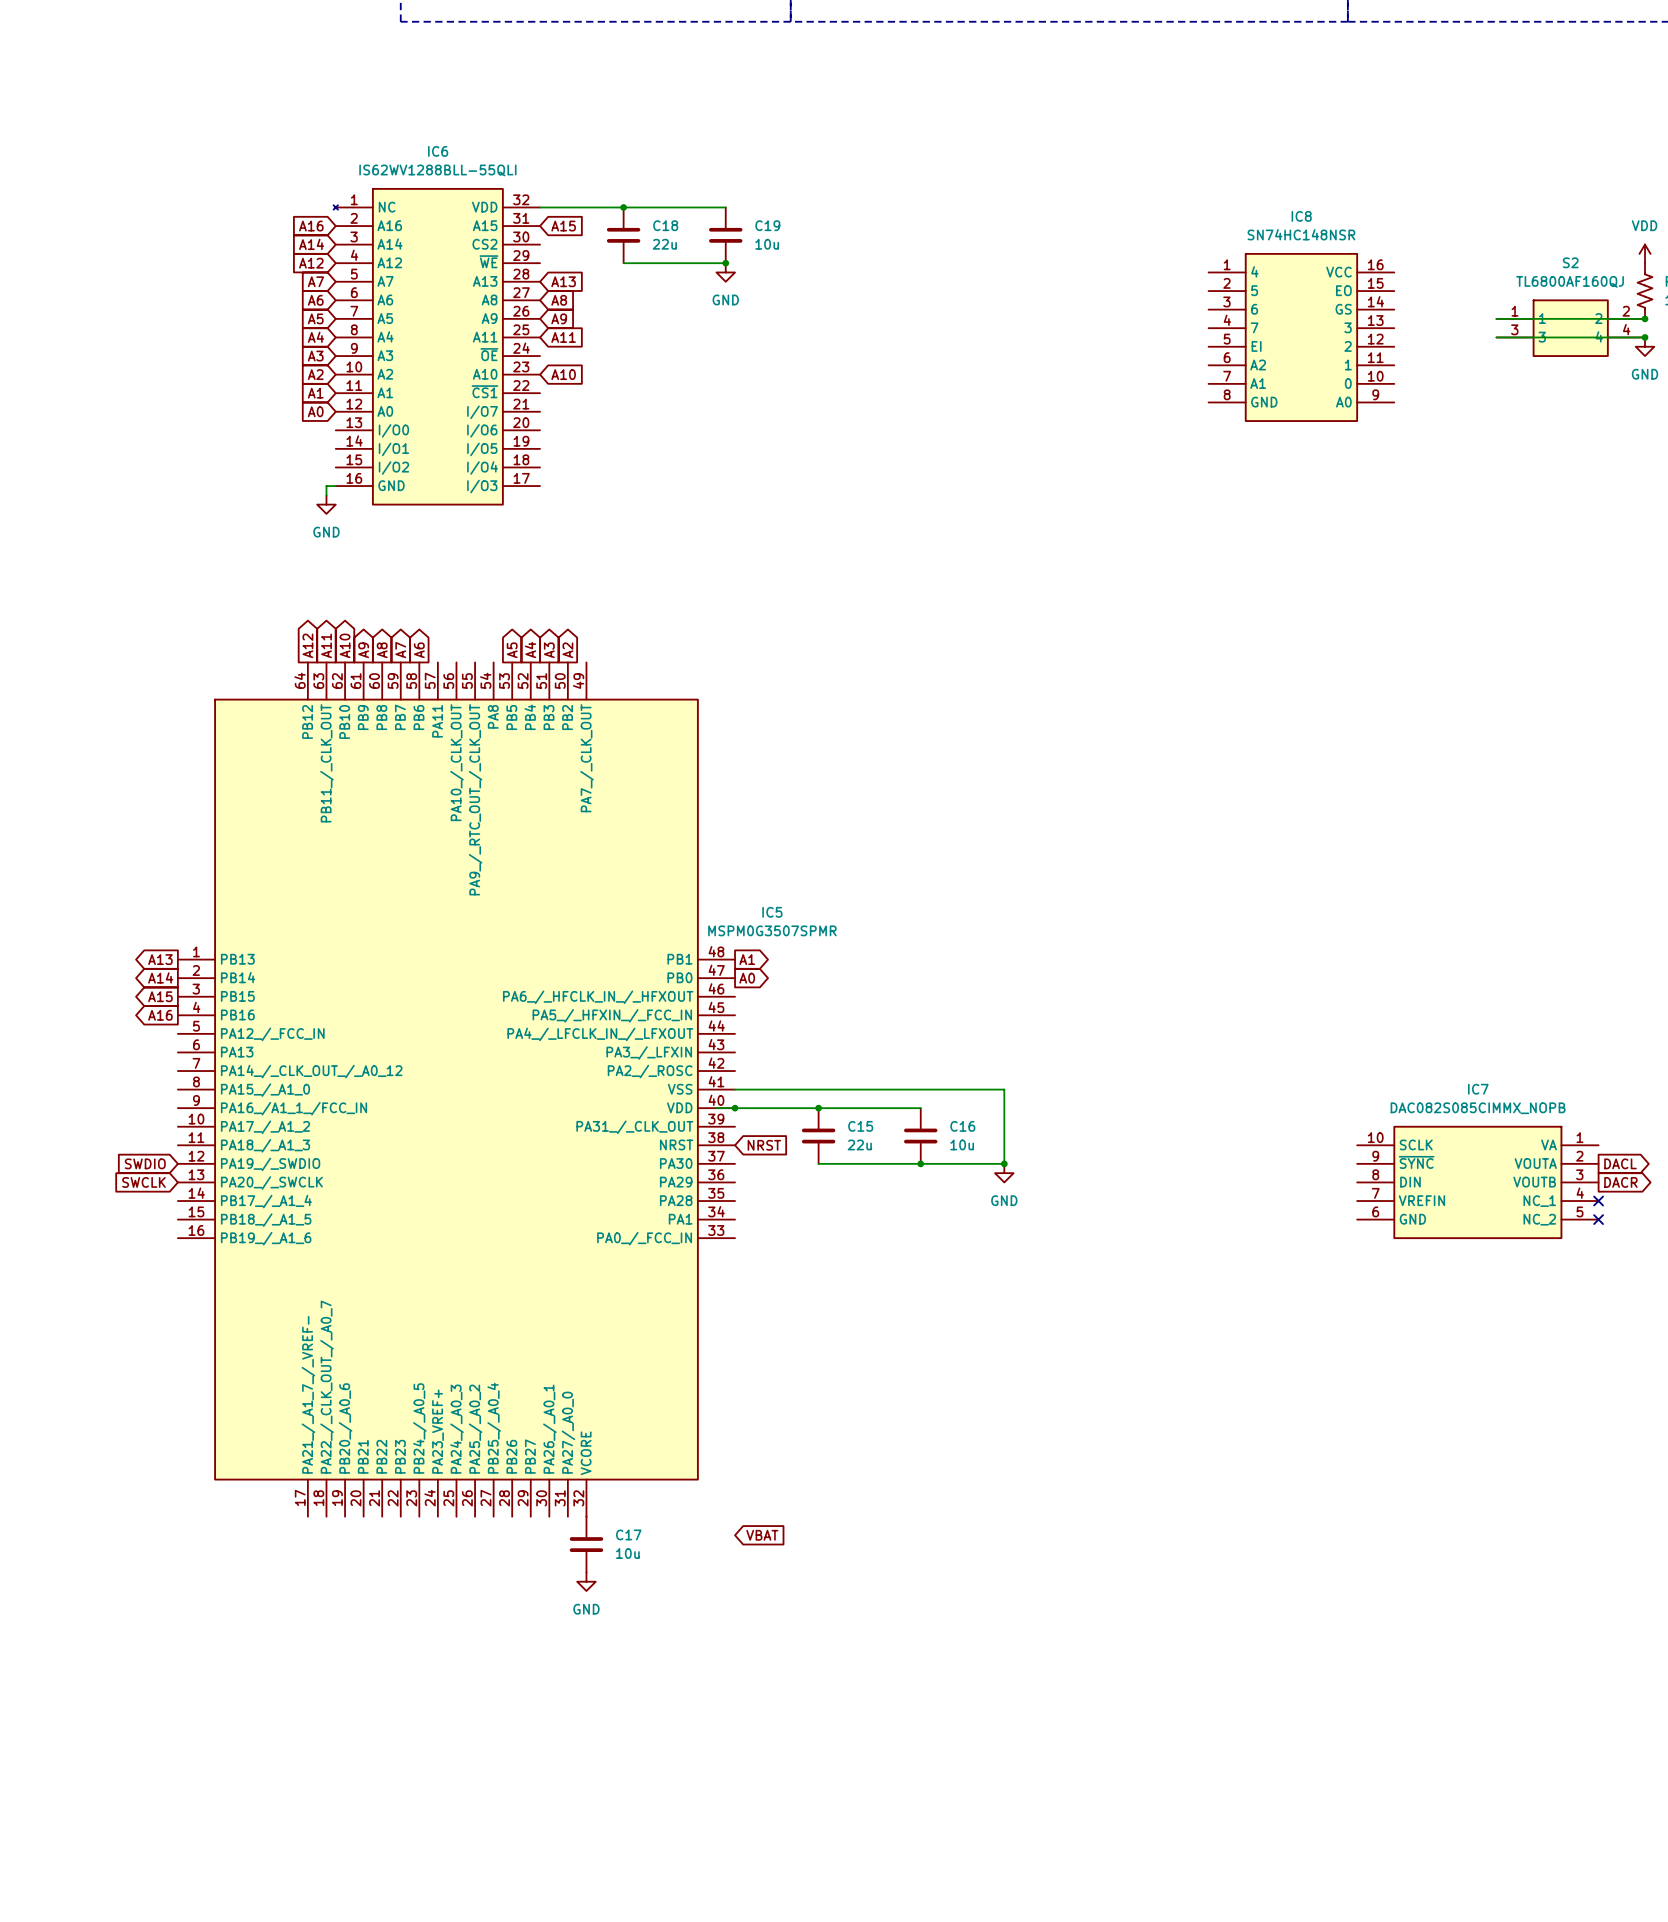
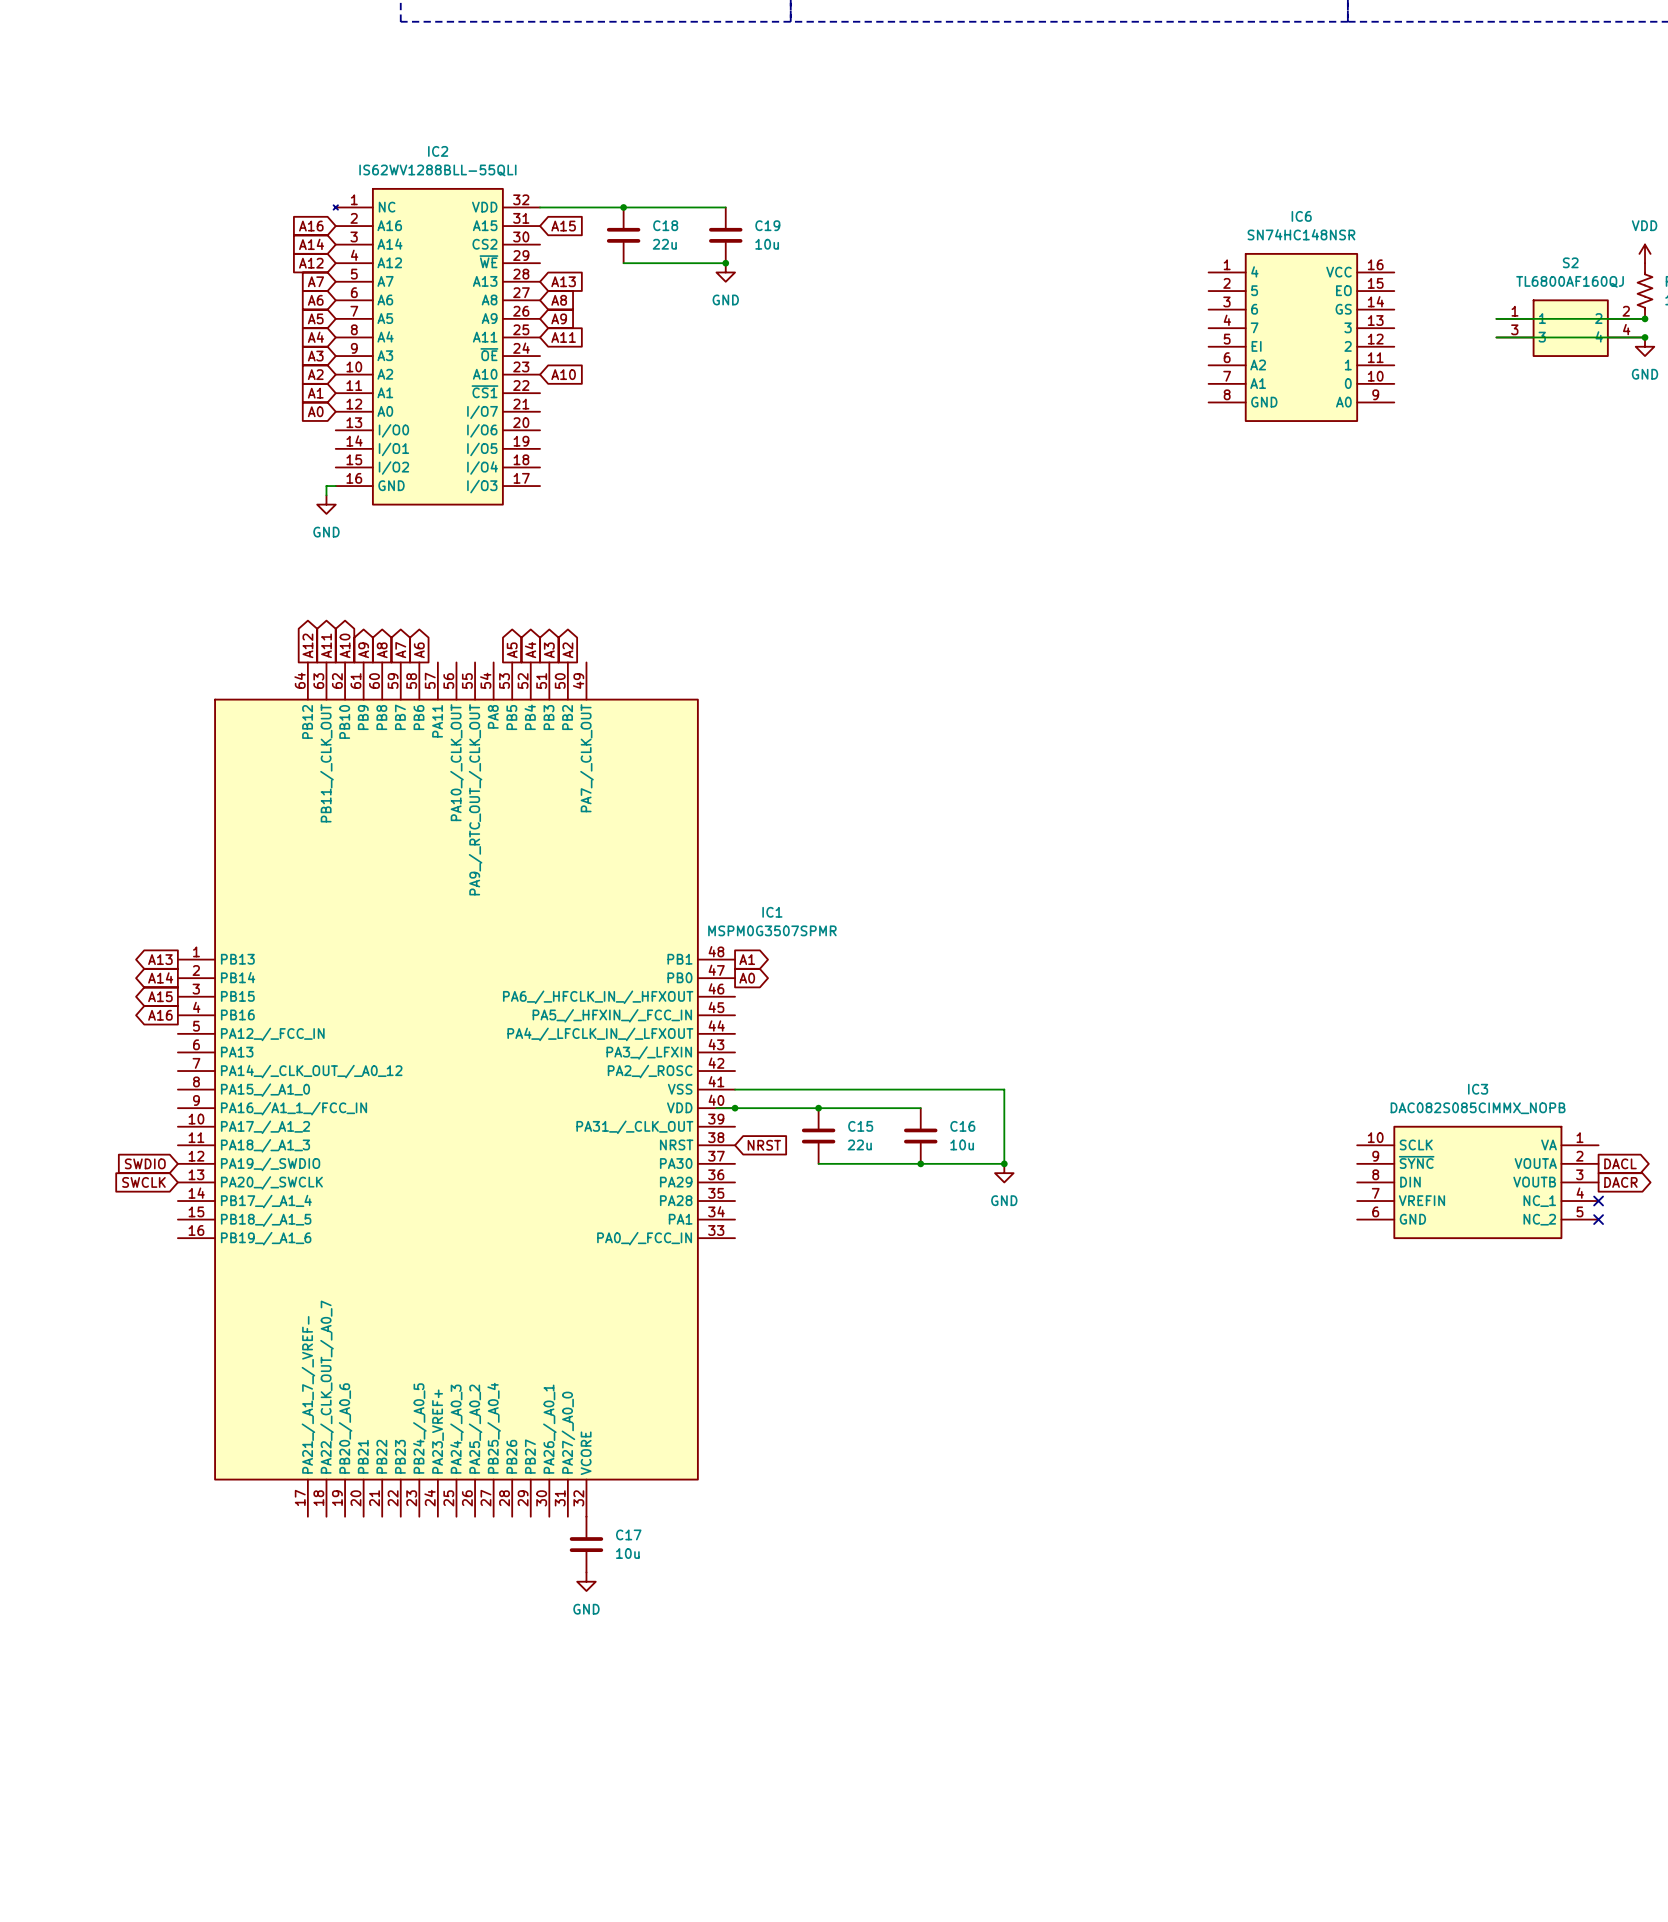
IC6 name: IC6 (438, 151) -> IC2 (438, 151)
IC8 name: IC8 (1301, 216) -> IC6 (1301, 216)
IC5 name: IC5 (772, 912) -> IC1 (772, 912)
IC7 name: IC7 (1478, 1089) -> IC3 (1478, 1089)
global label: VBAT (762, 1535) -> none

